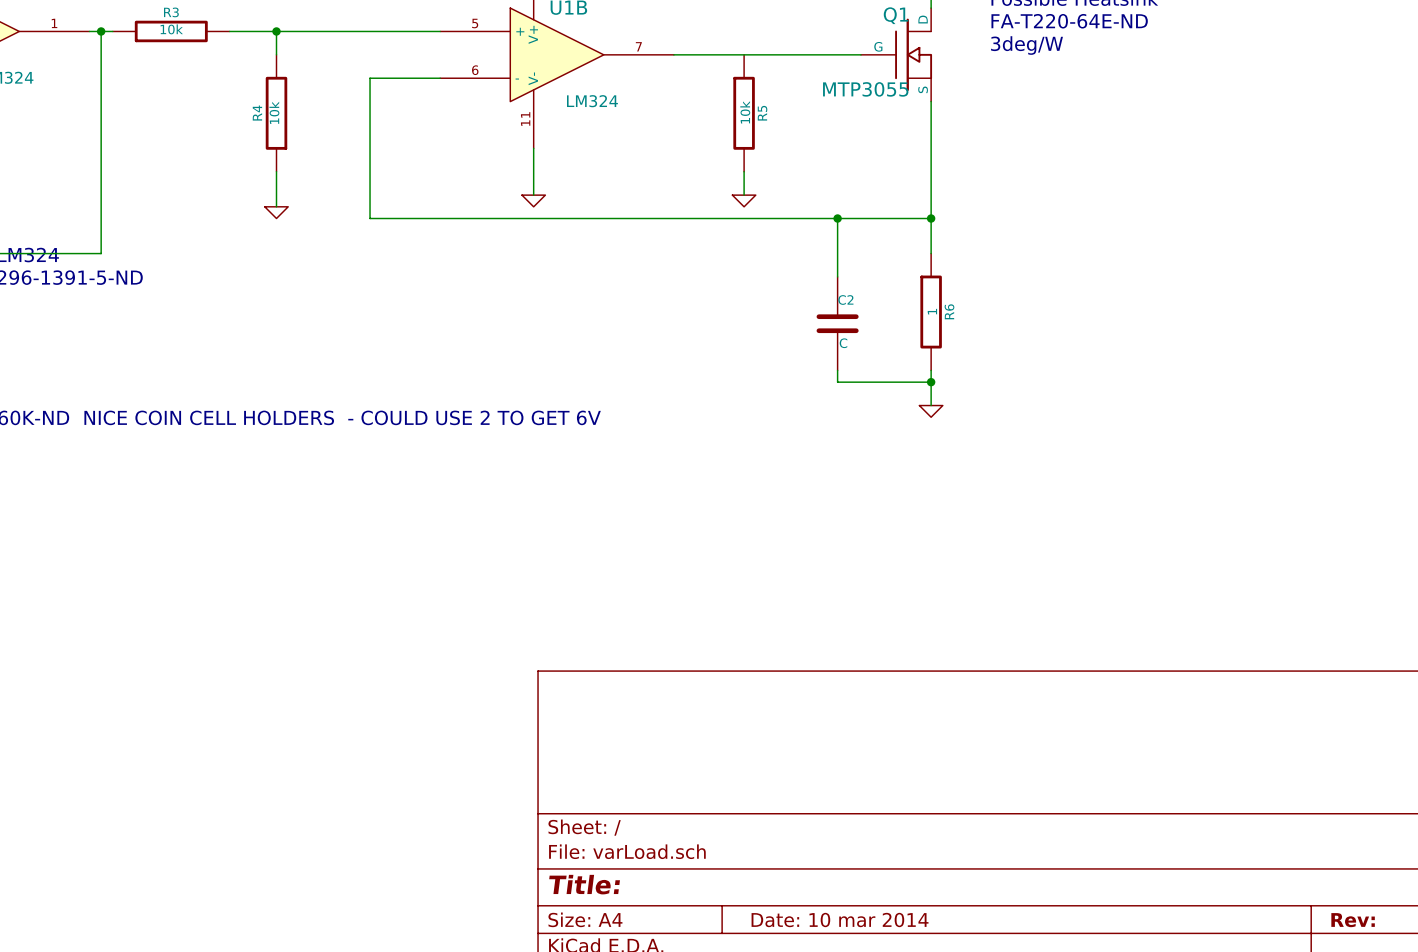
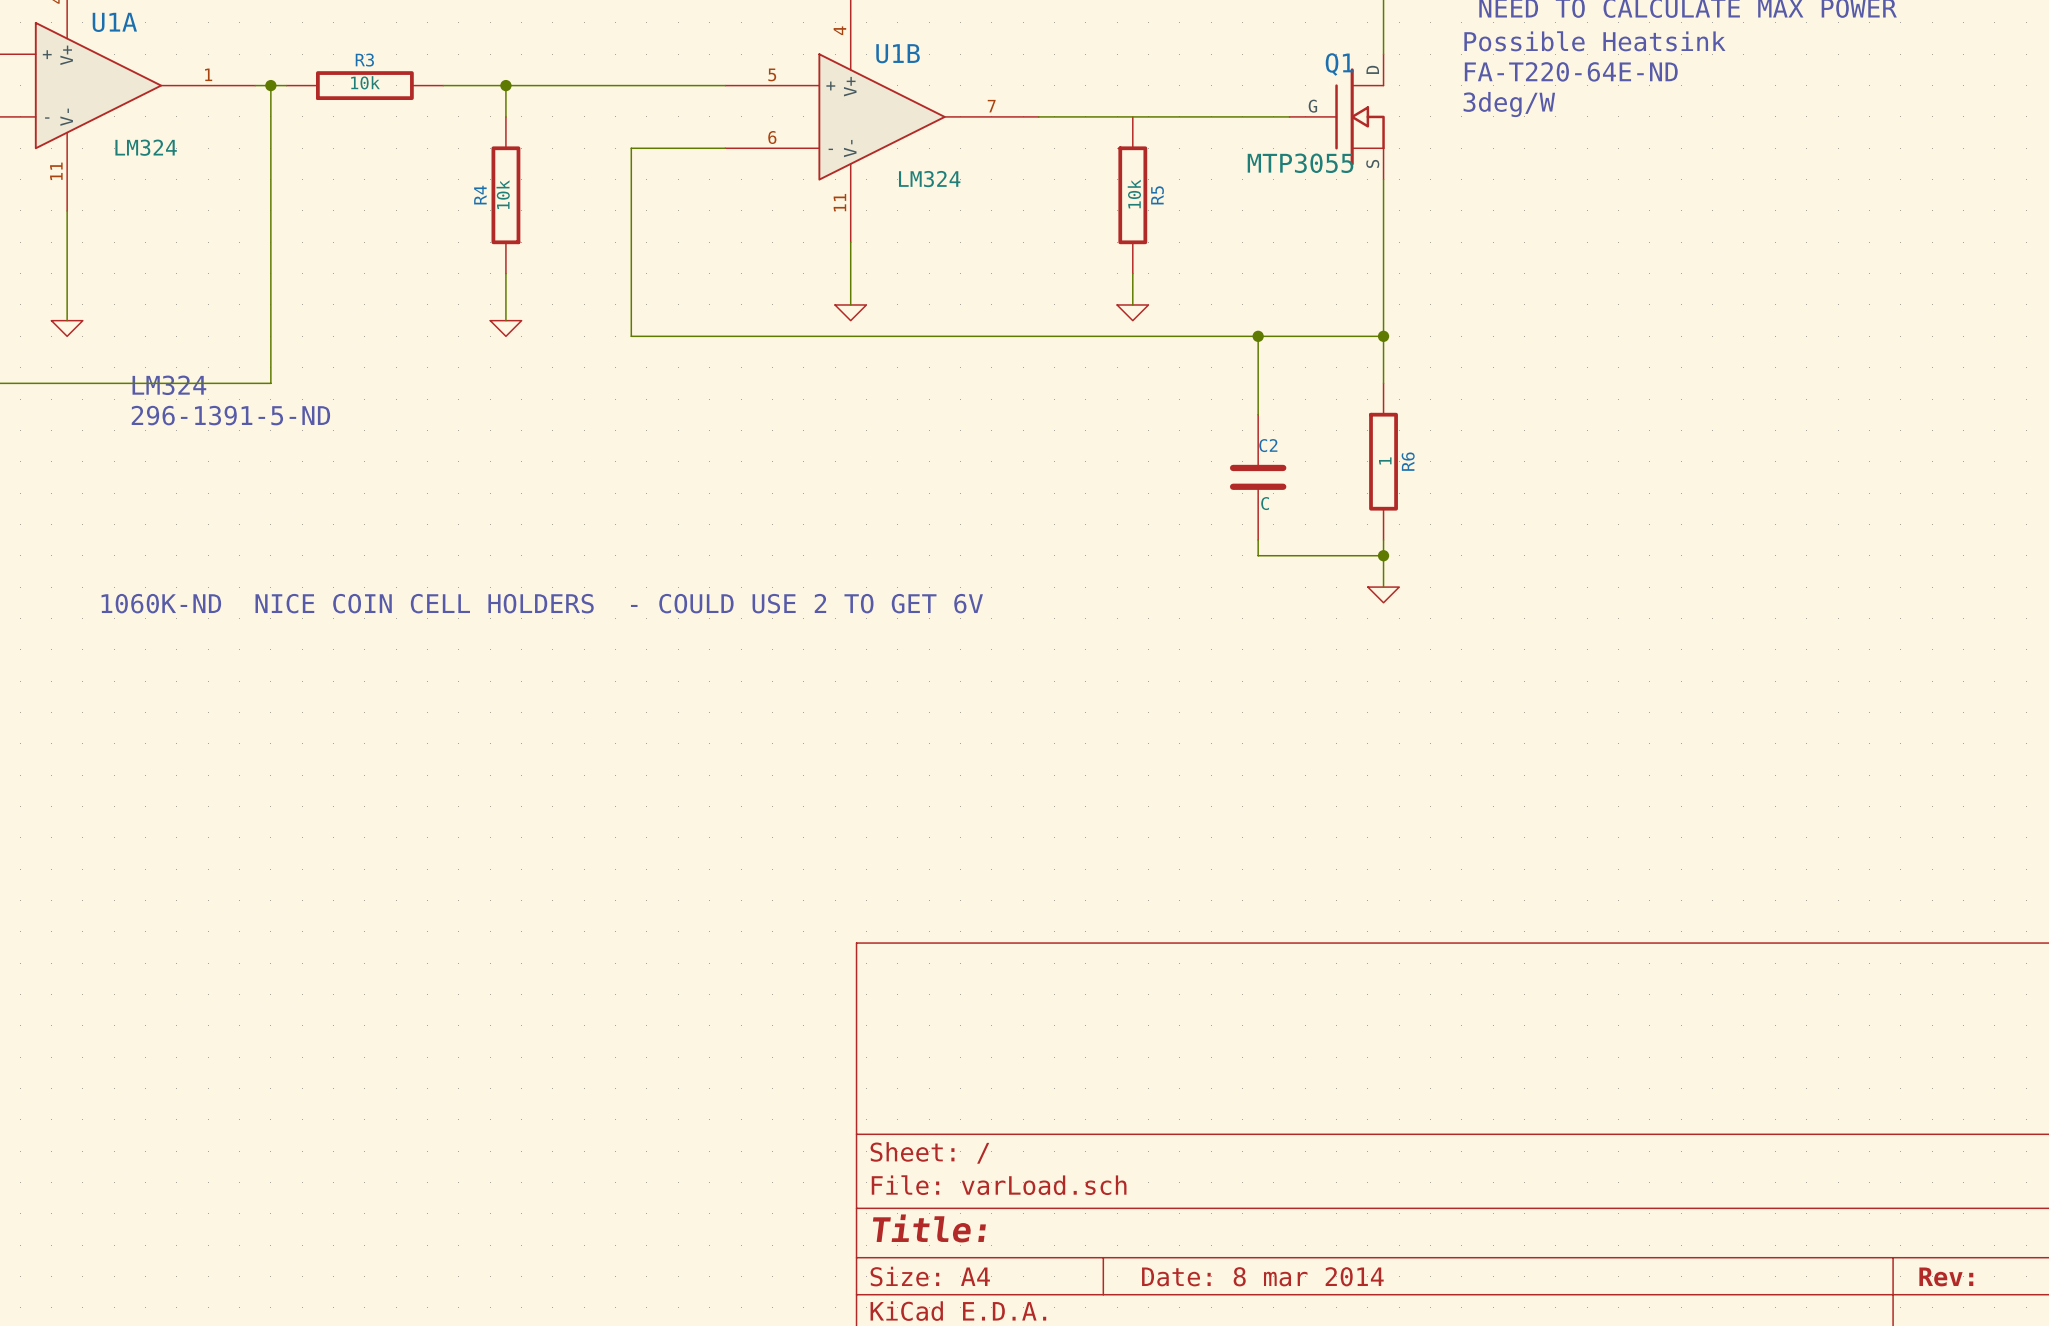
title block: Date: 10 mar 2014 (840, 920) -> Date: 8 mar 2014 (1262, 1276)

